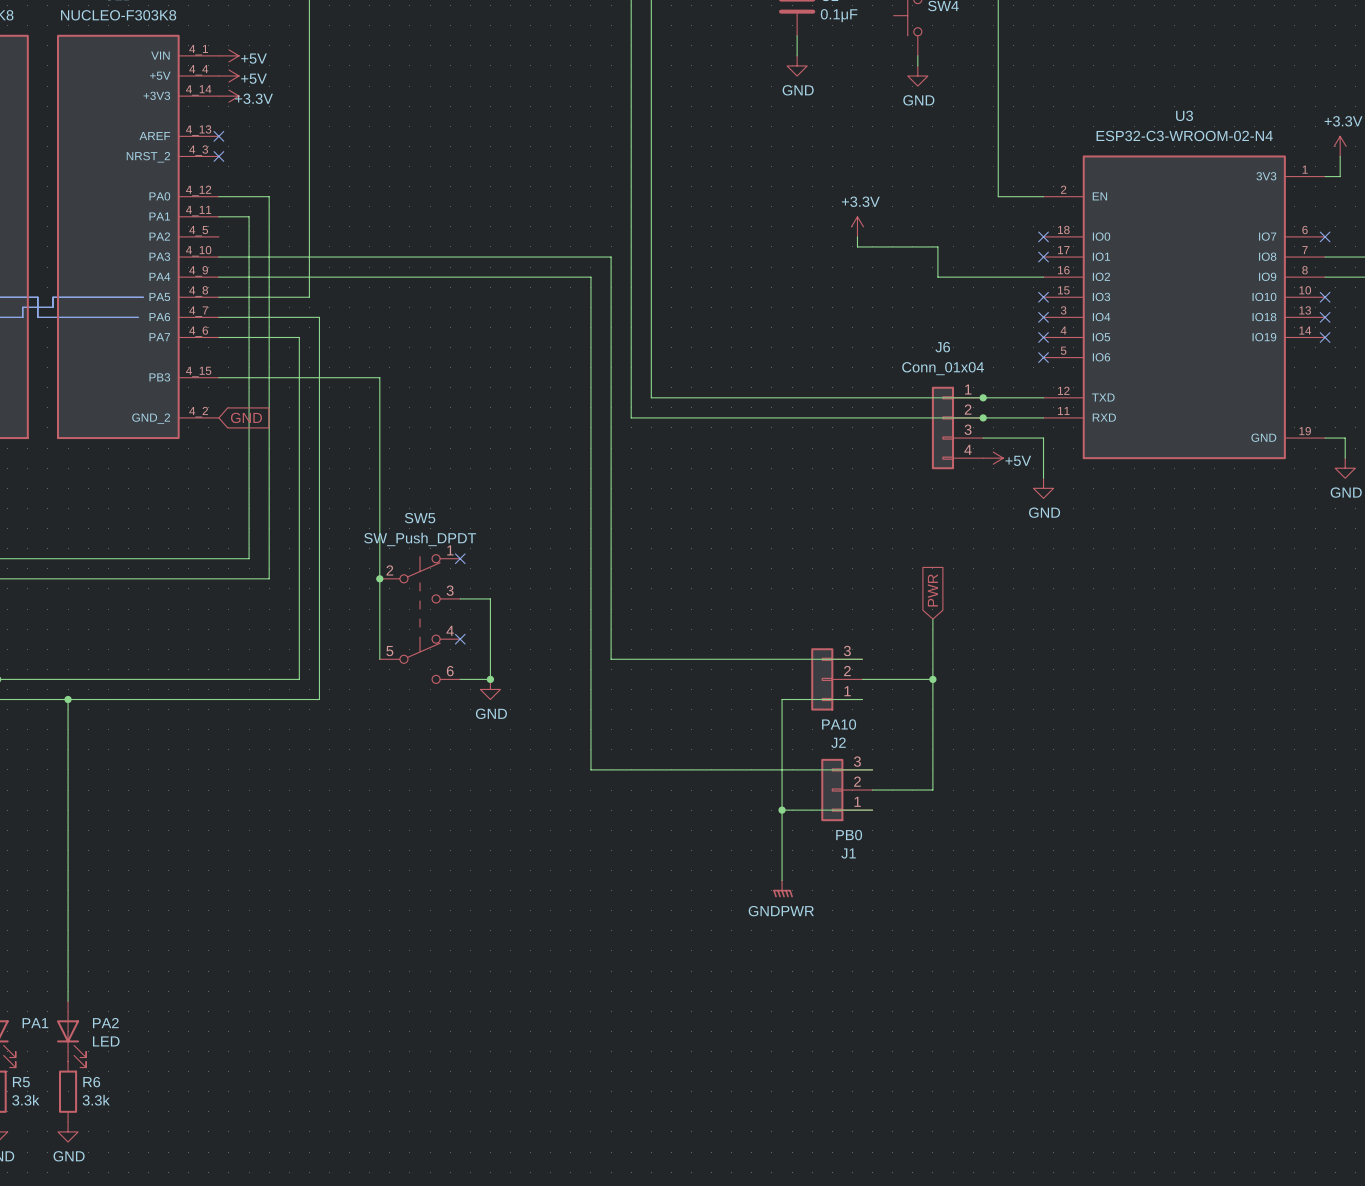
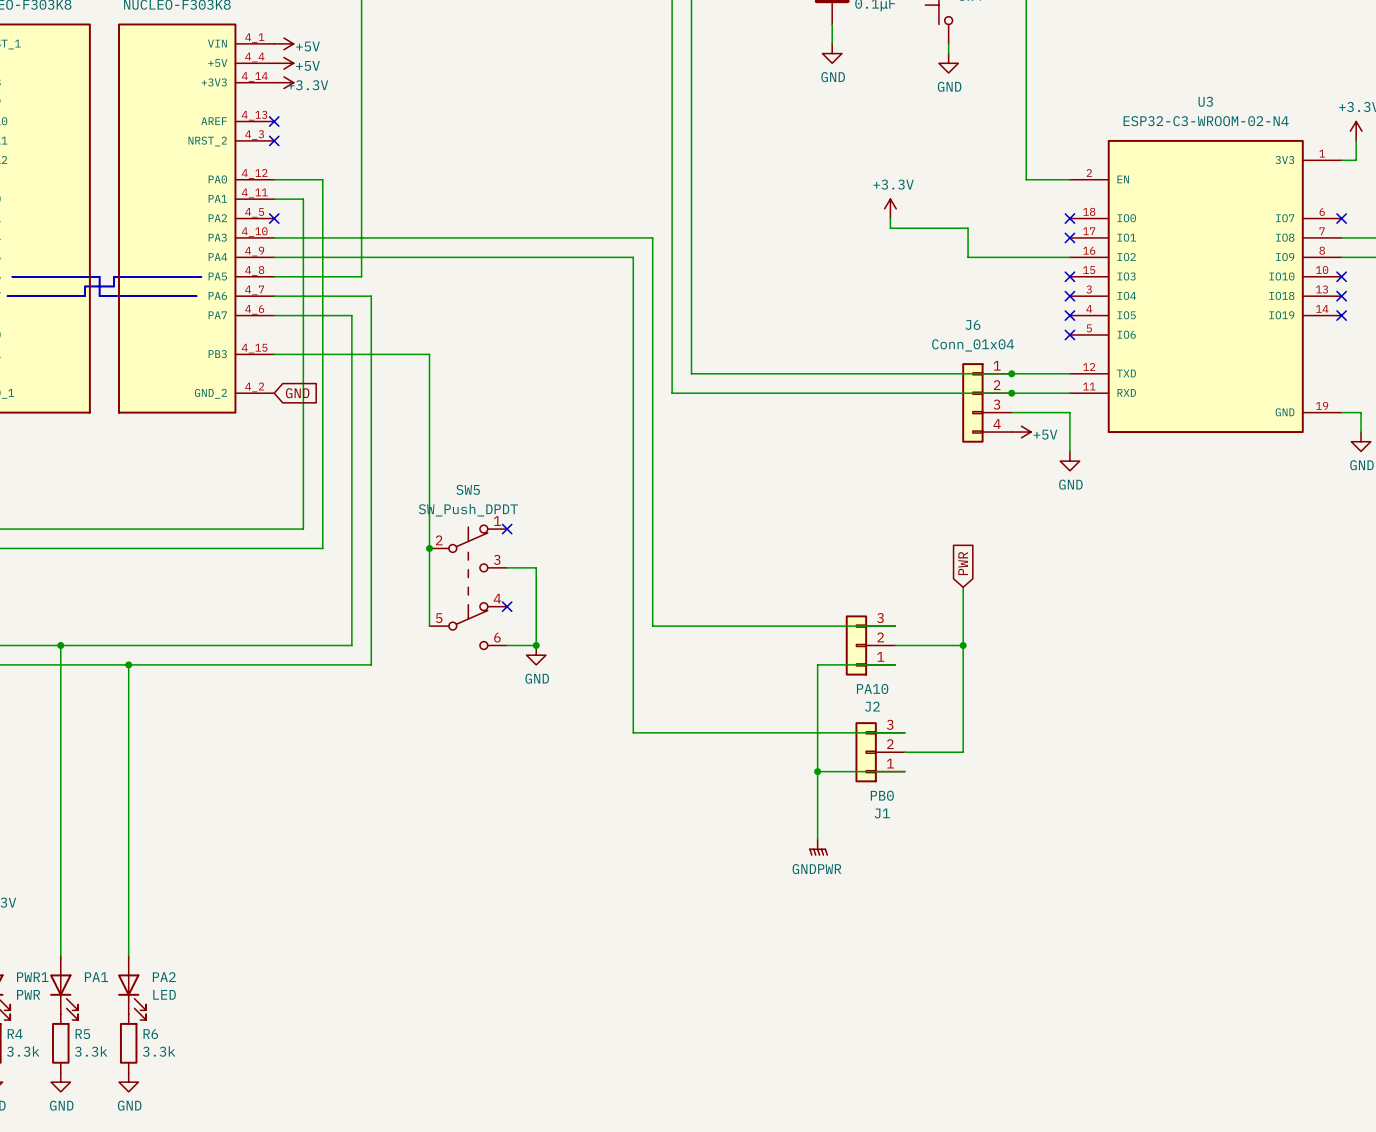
no-connect mark: none -> (274, 218)

